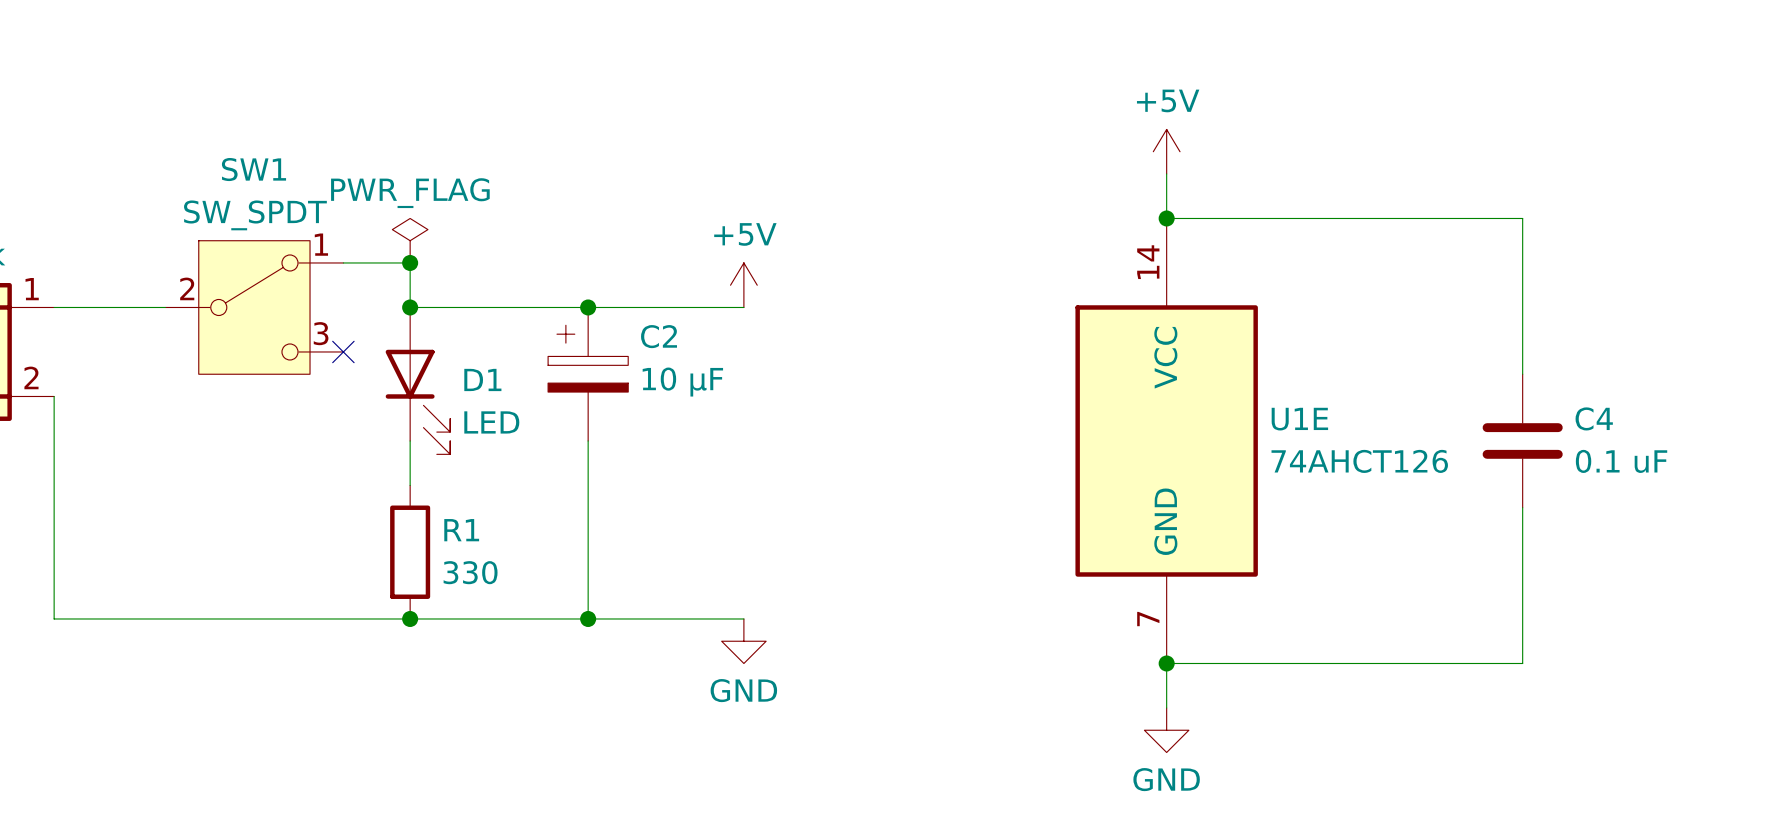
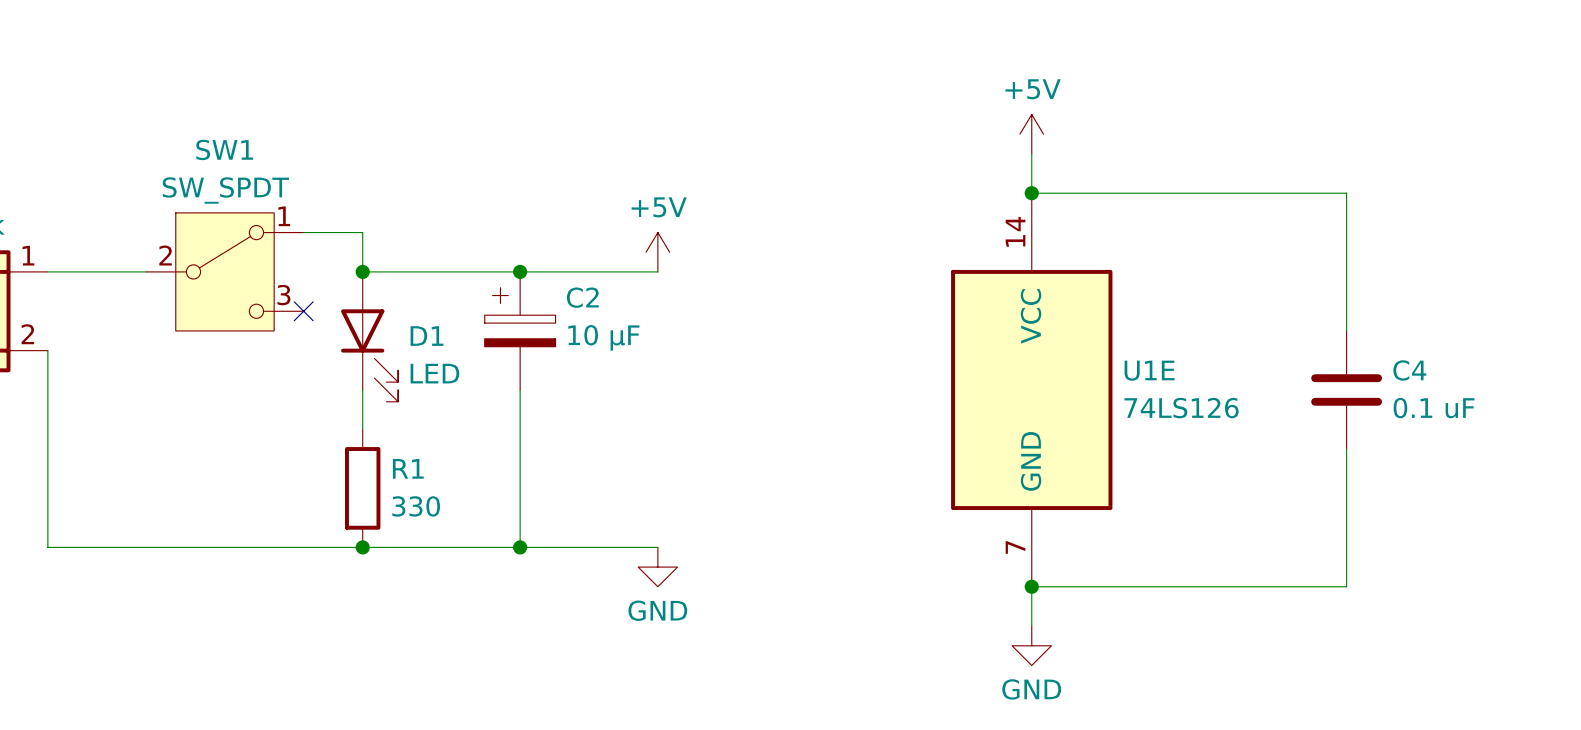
power symbol: PWR_FLAG (410, 240) -> none
junction: (410, 262) -> none
U1E value: 74AHCT126 (1359, 461) -> 74LS126 (1181, 408)

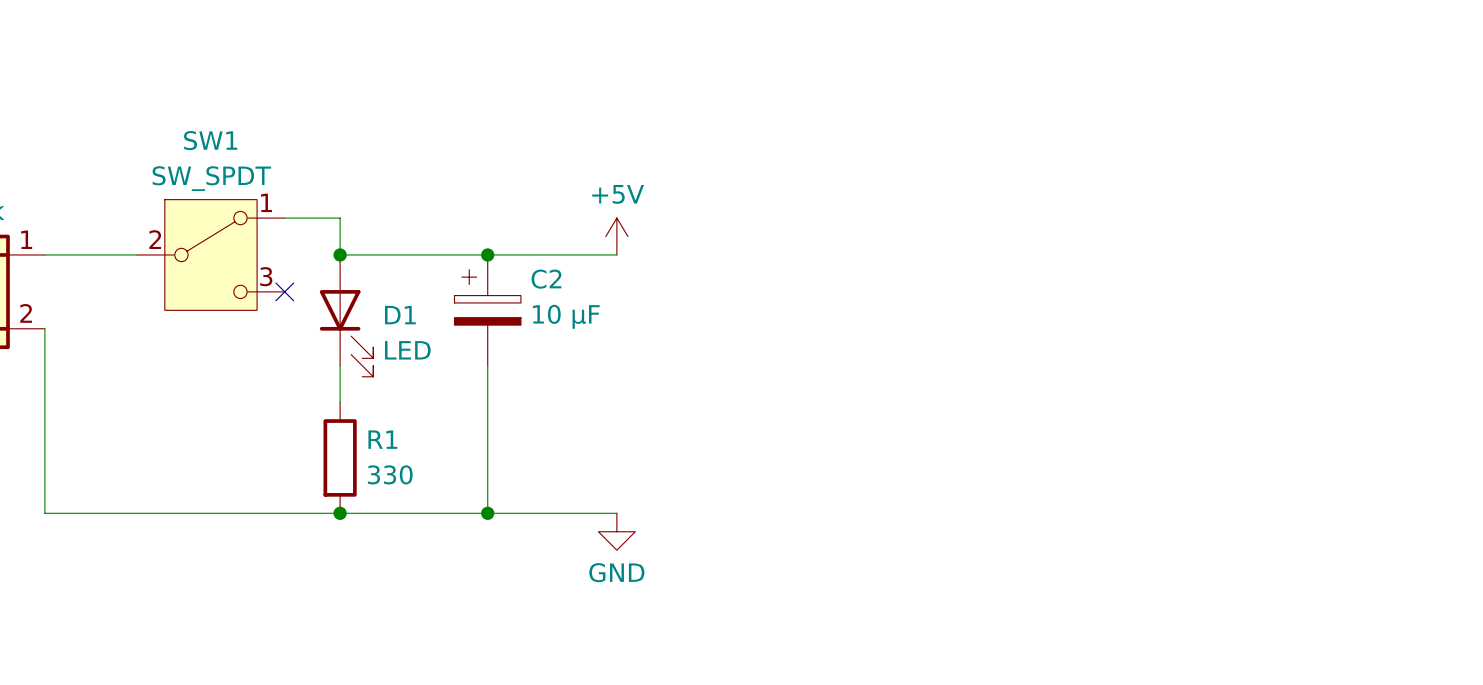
power symbol: +5V (1031, 134) -> none
wire: (1031, 153) (1031, 193) (1346, 193) (1346, 330) -> none
junction: (1031, 193) -> none
U1E: 74LS126 (1031, 389) -> none
C4: 0.1 uF (1346, 389) -> none
wire: (1346, 449) (1346, 586) (1031, 586) (1031, 626) -> none
junction: (1031, 586) -> none
power symbol: GND (1031, 645) -> none

